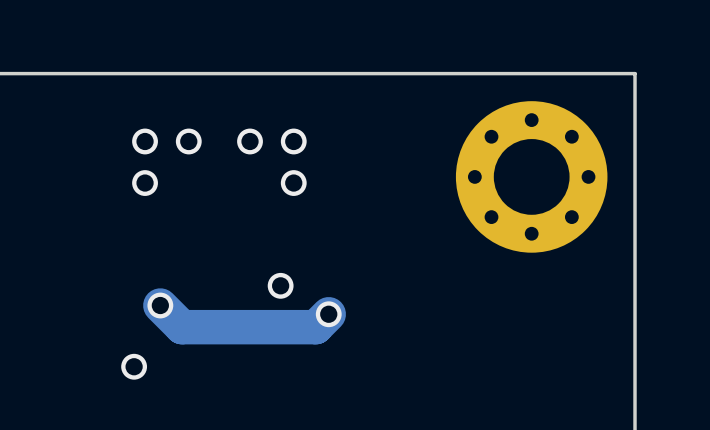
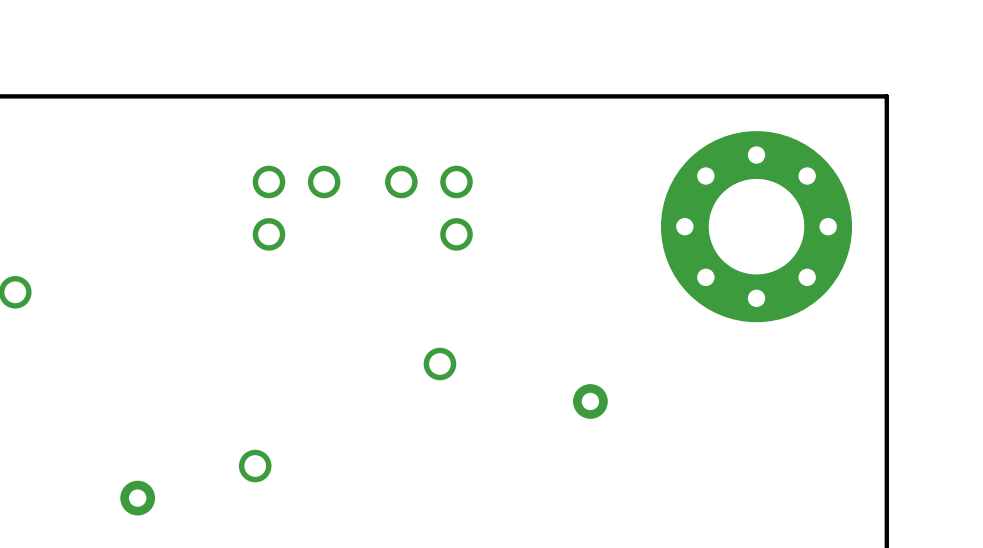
track: (160, 305) (182, 327) (315, 327) (328, 314) -> none
via: (160, 305) -> none
via: (328, 314) -> none
via: none -> (590, 401)
via: none -> (137, 498)

